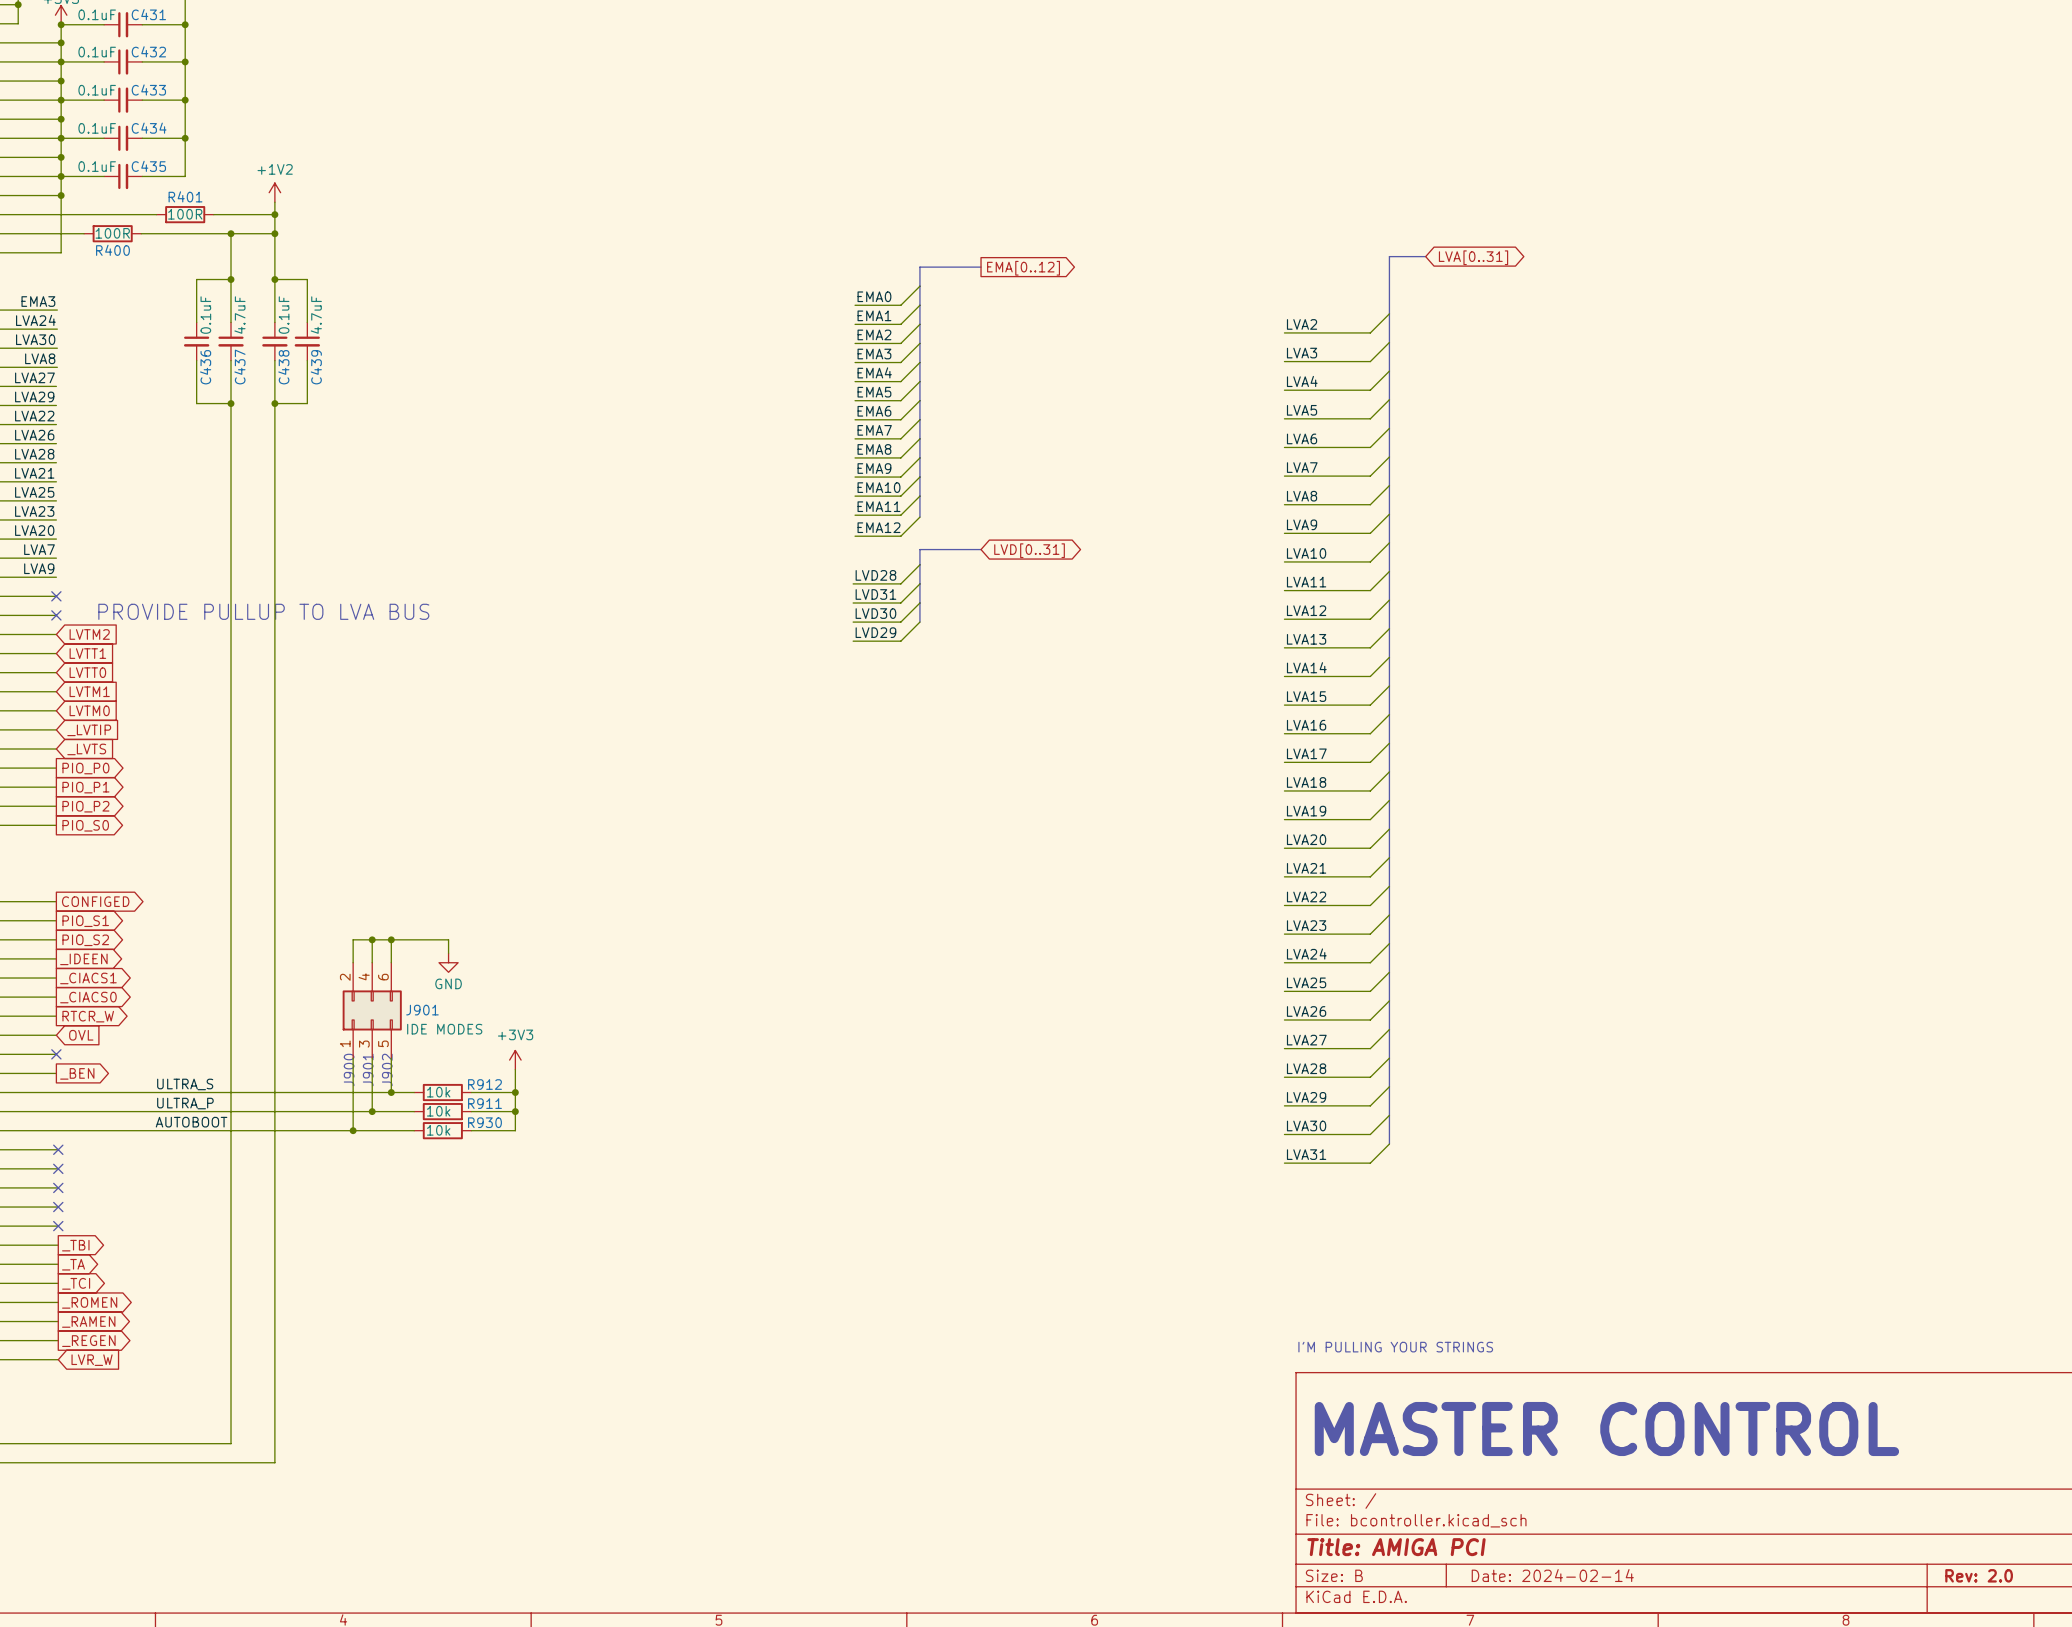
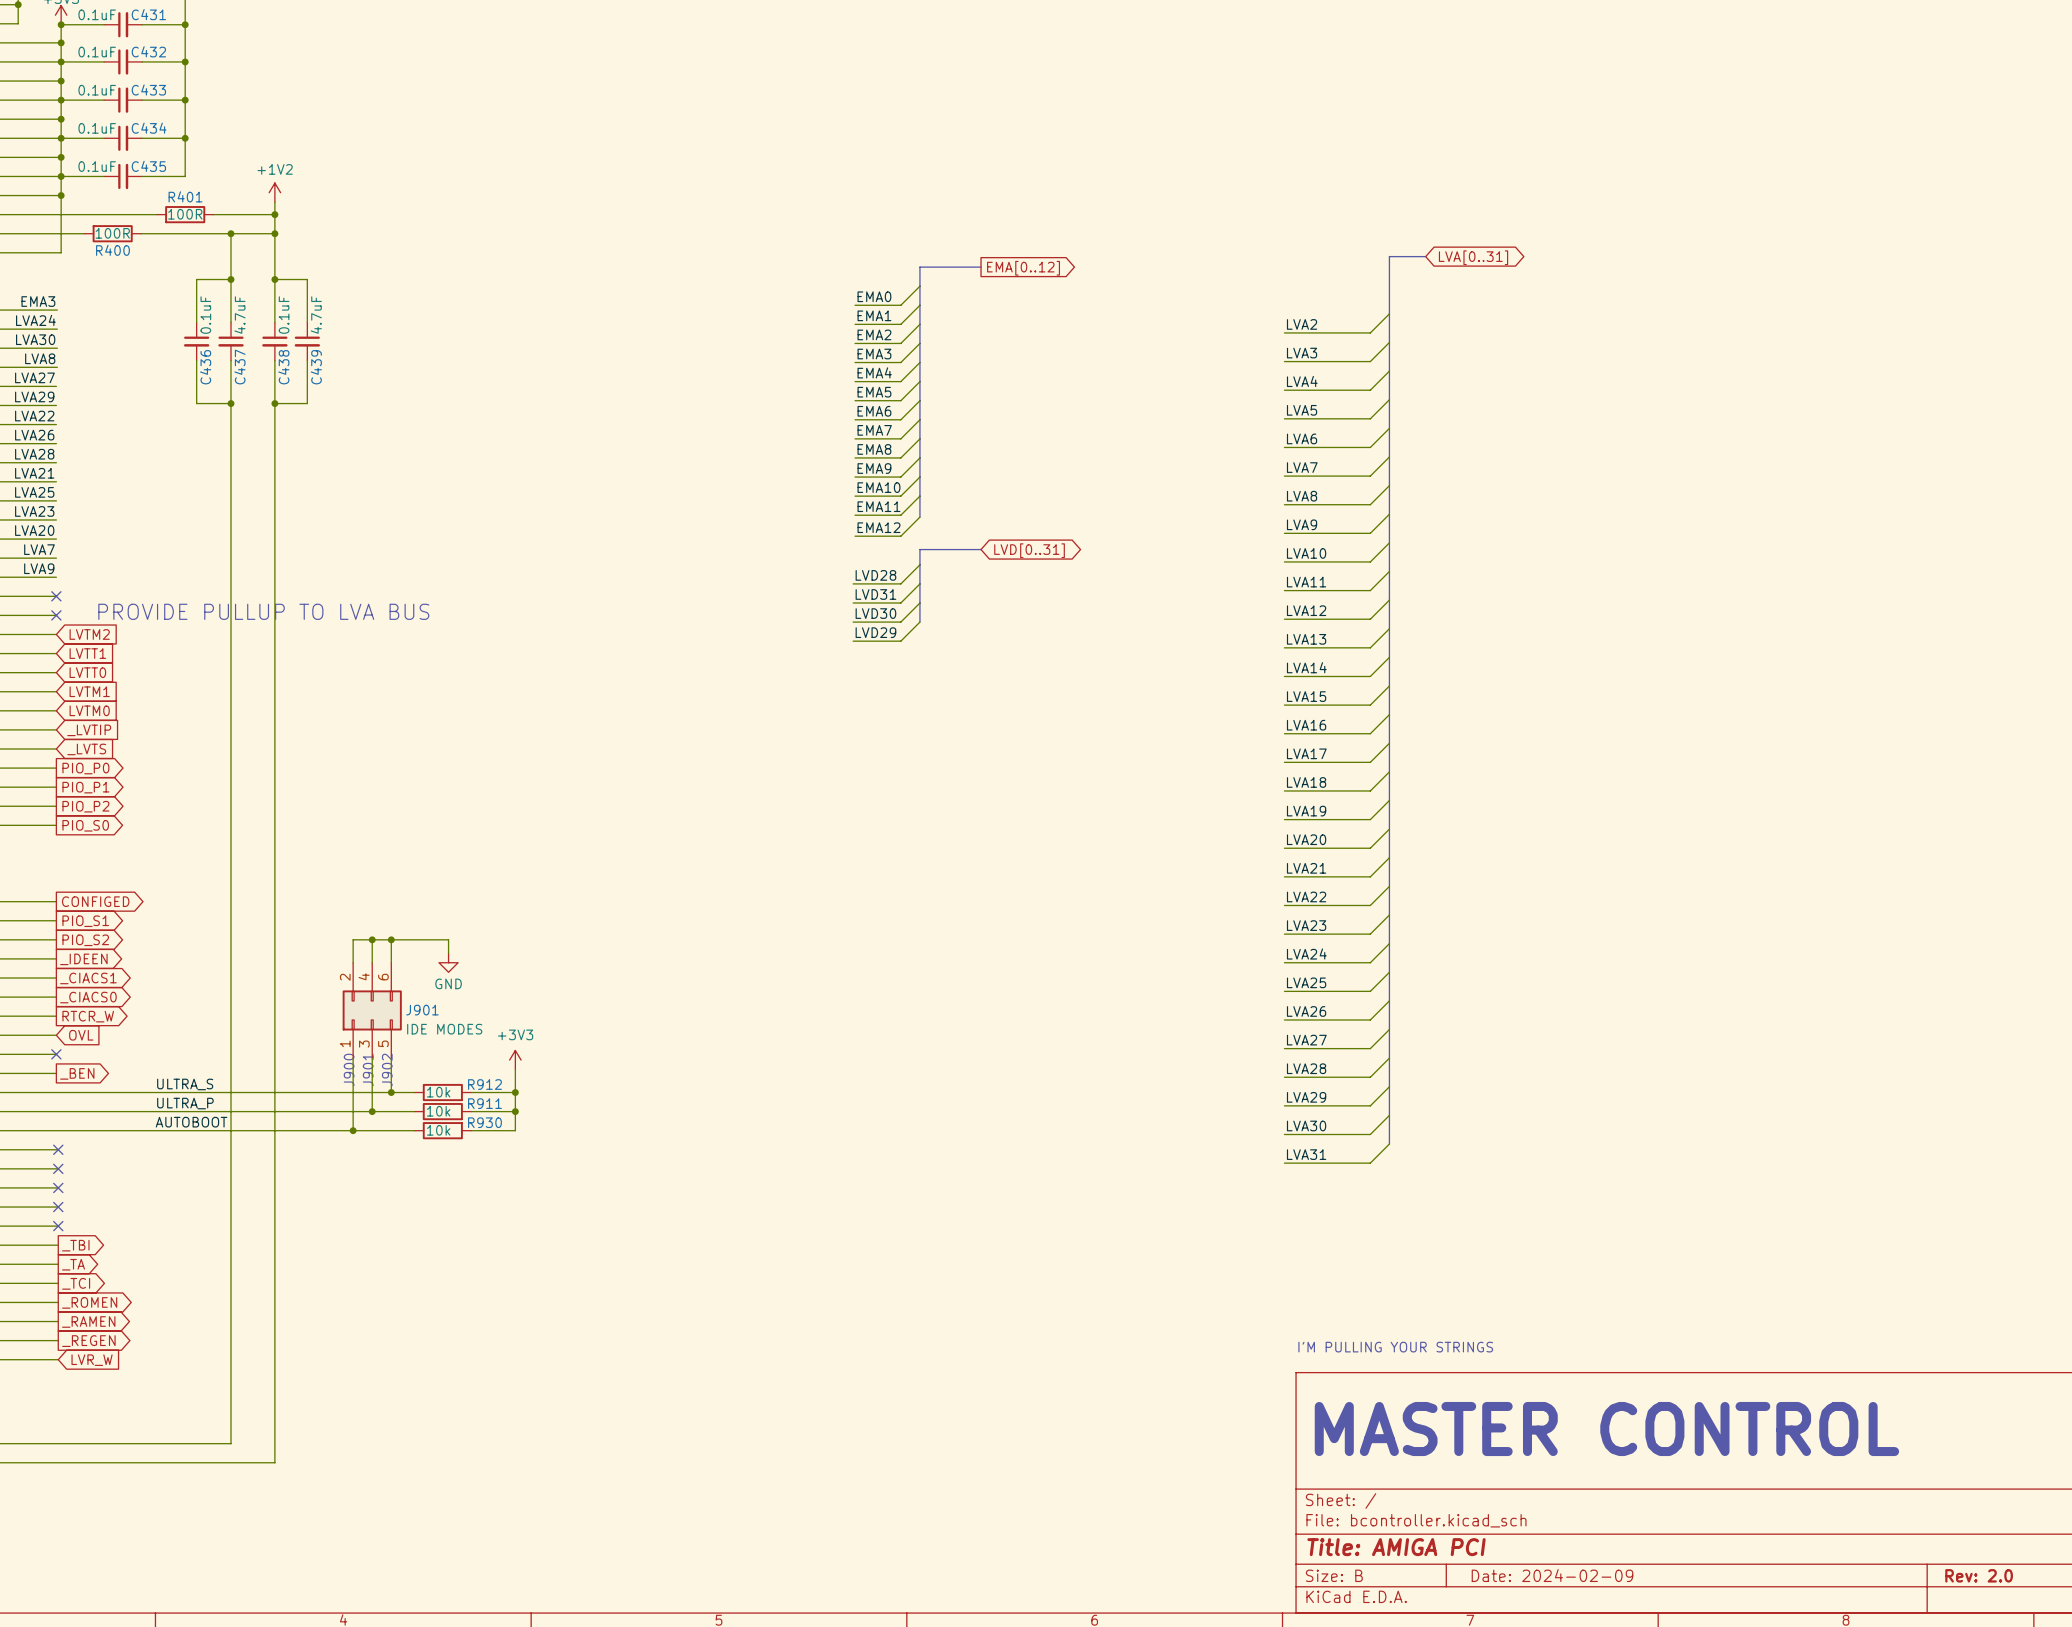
title block: Date: 2024-02-14 (1552, 1575) -> Date: 2024-02-09 (1552, 1575)

